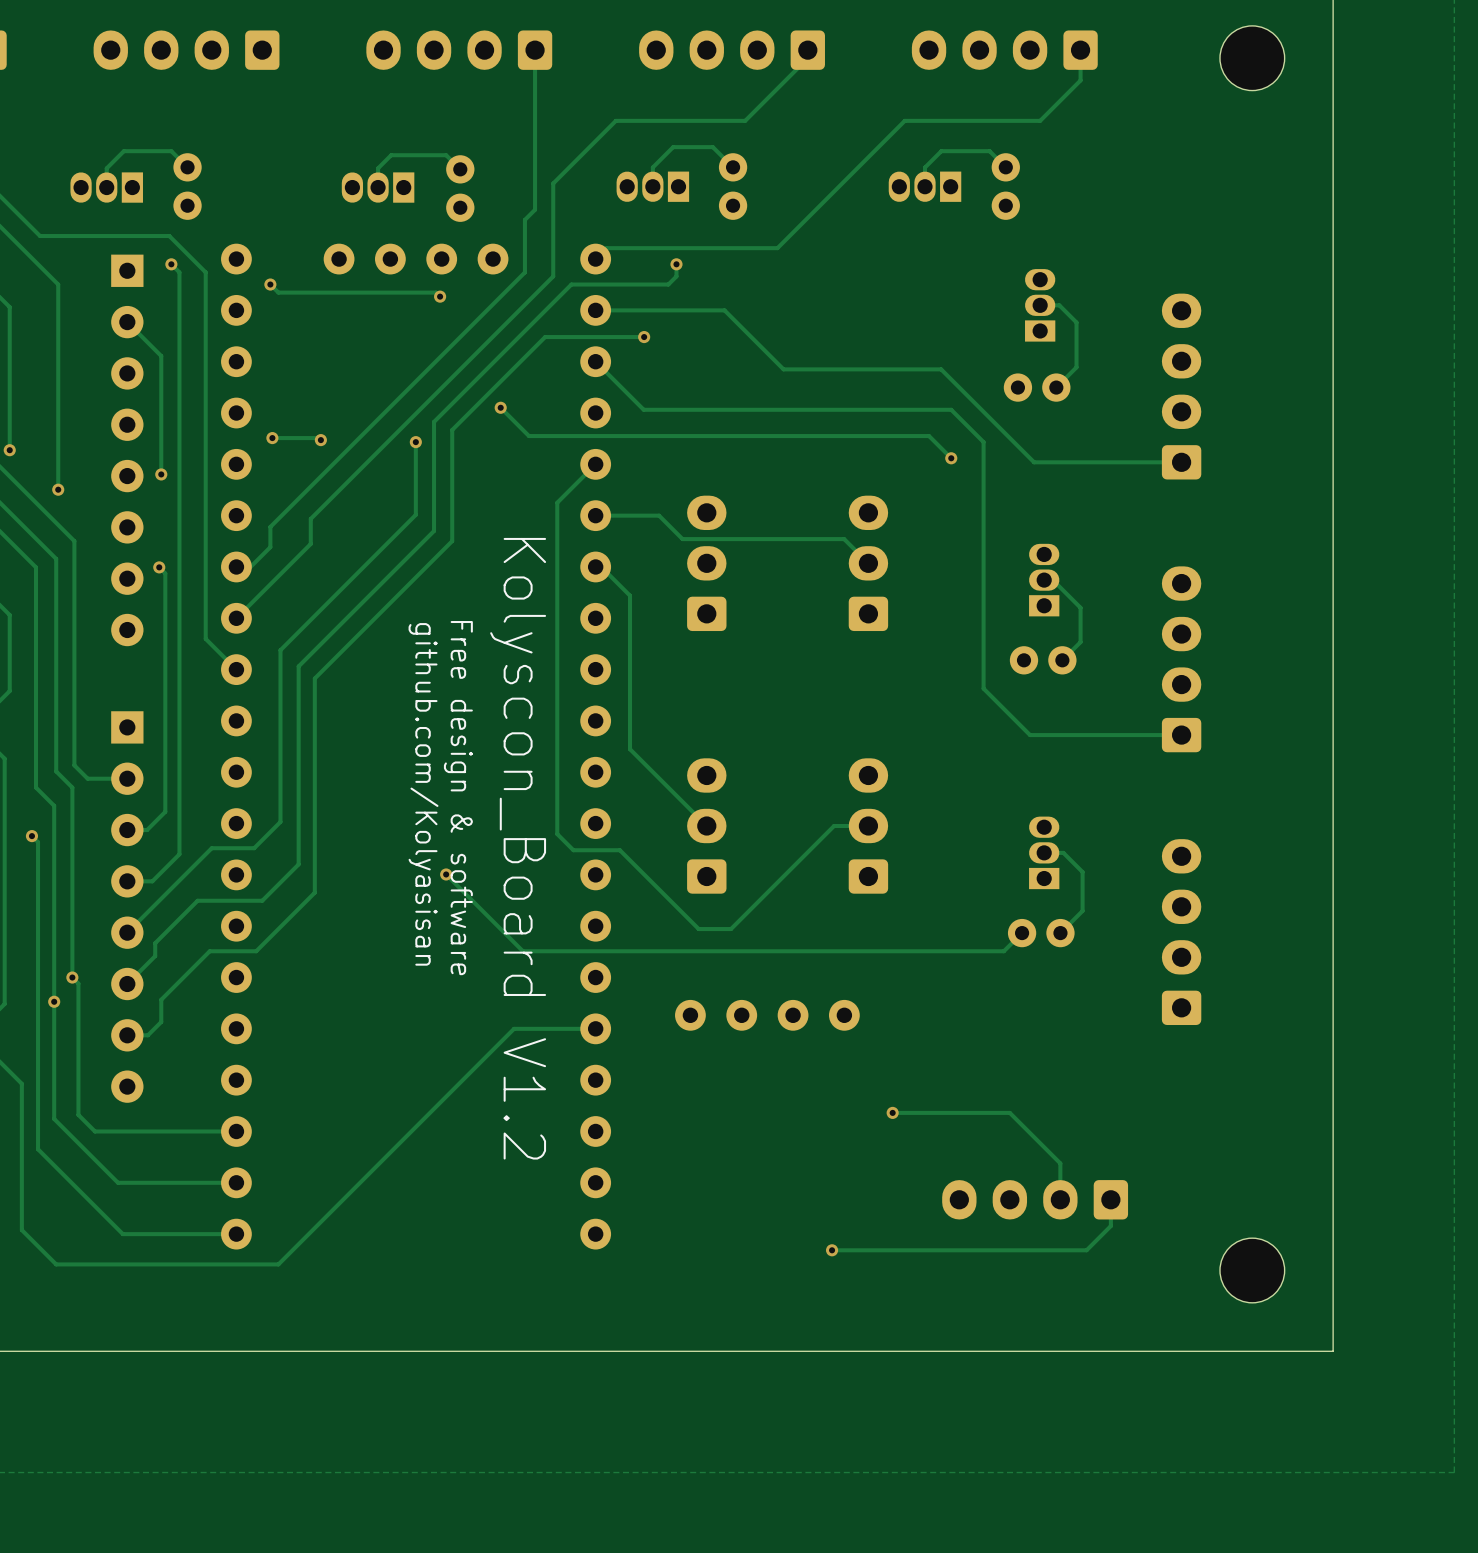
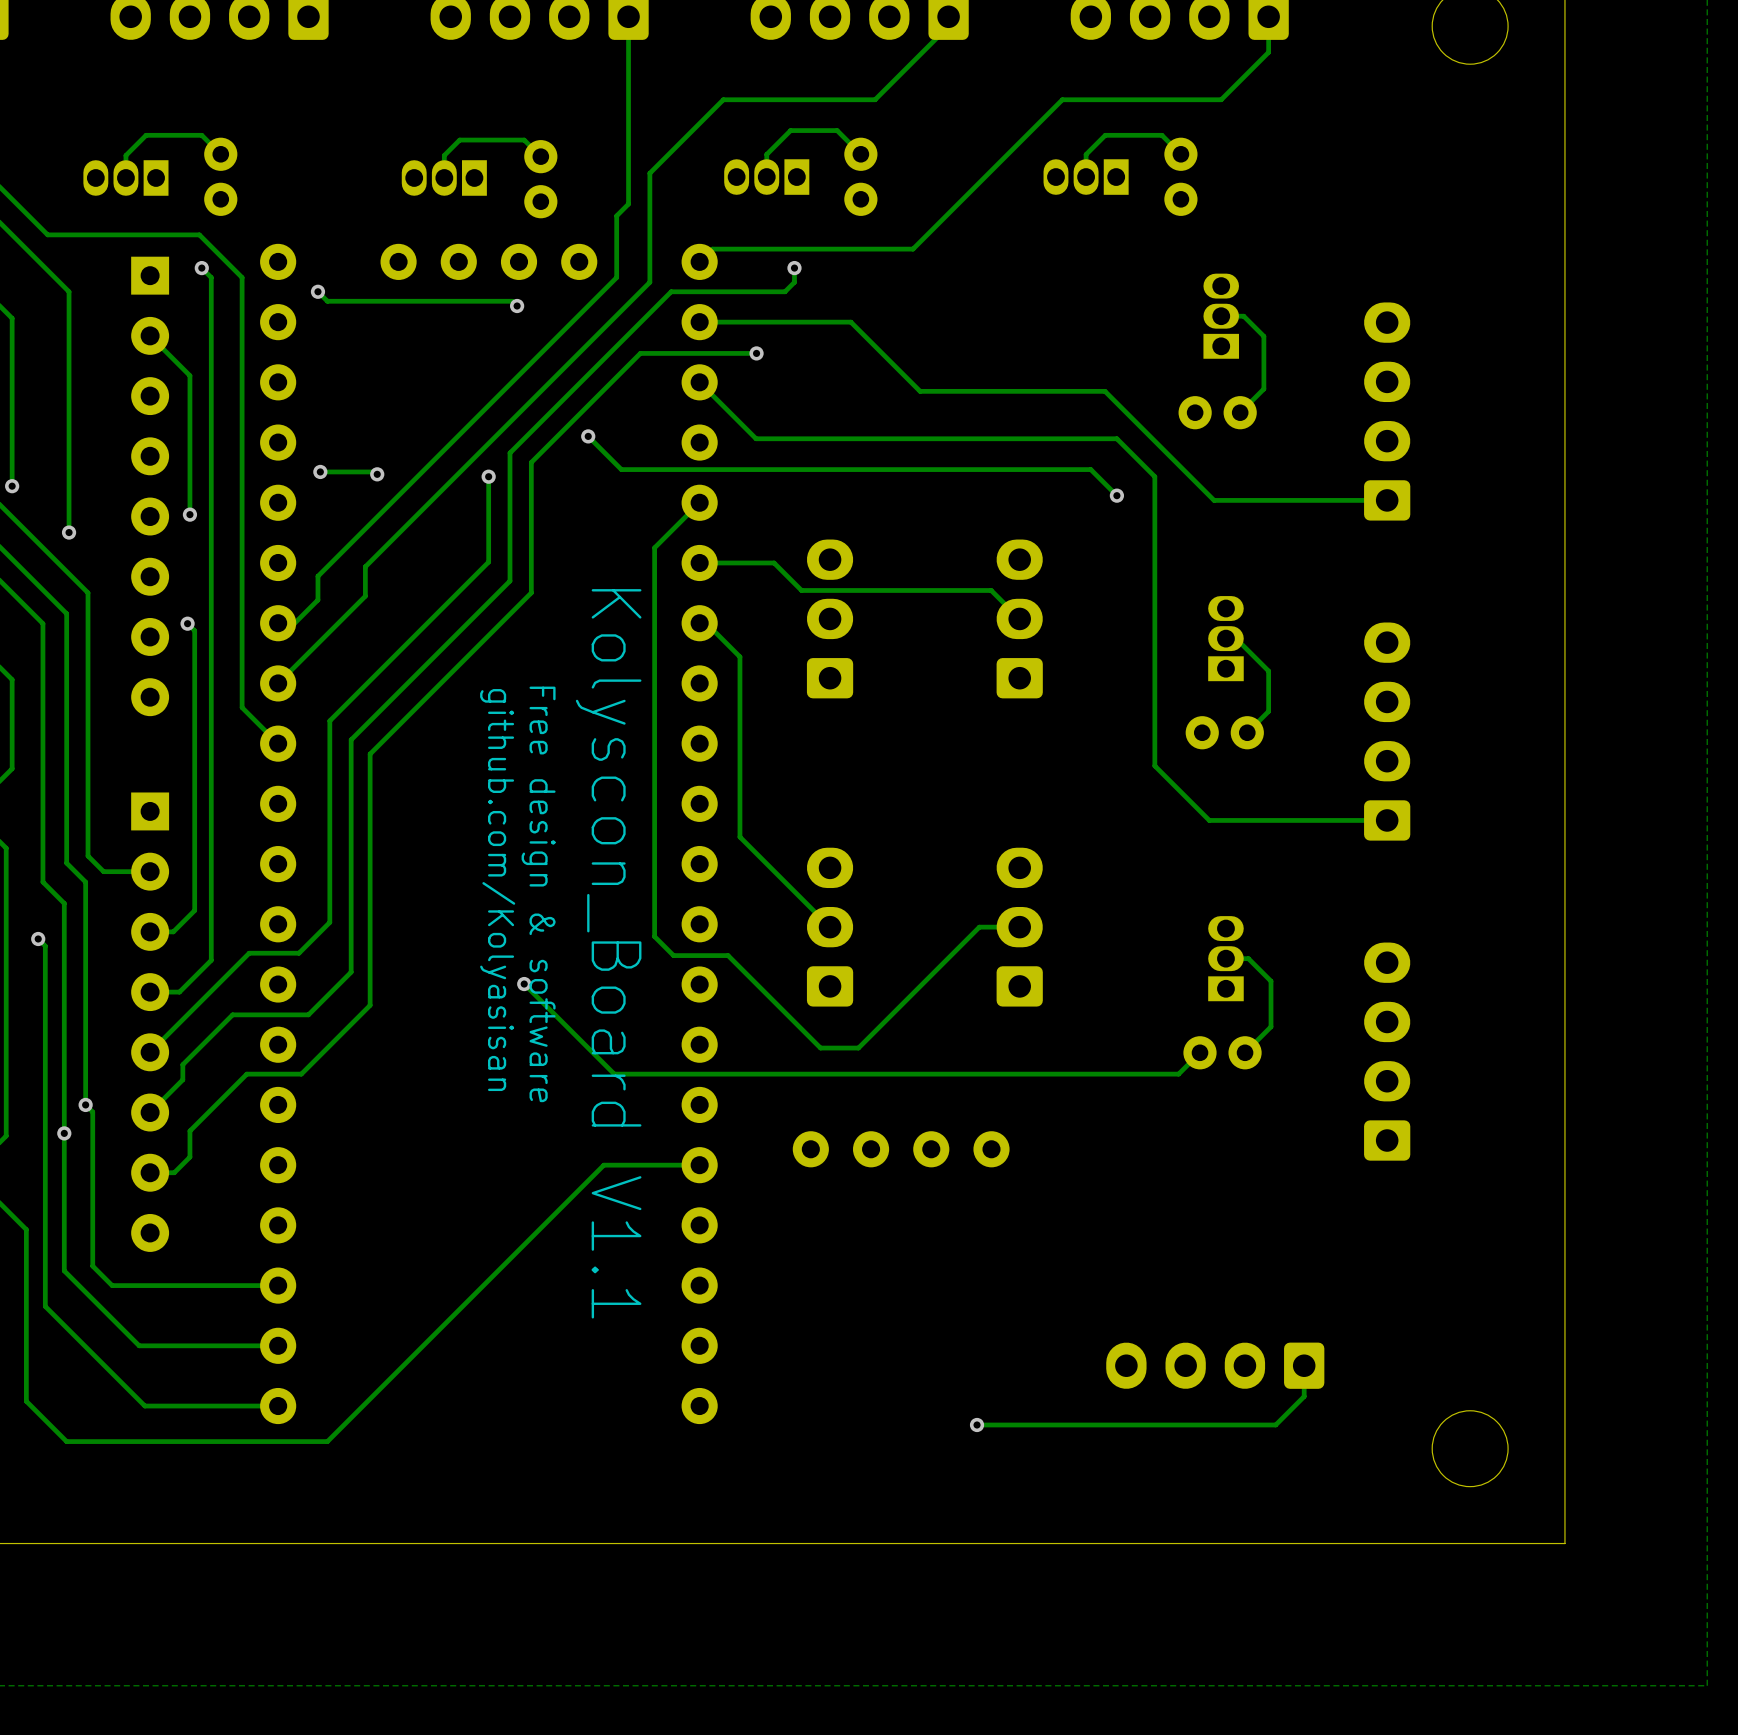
text: Kolyscon_Board V1.2 (518, 848) -> Kolyscon_Board V1.1 (608, 953)
track: (892, 1112) (1009, 1112) (1060, 1163) (1060, 1199) -> none
via: (892, 1112) -> none

